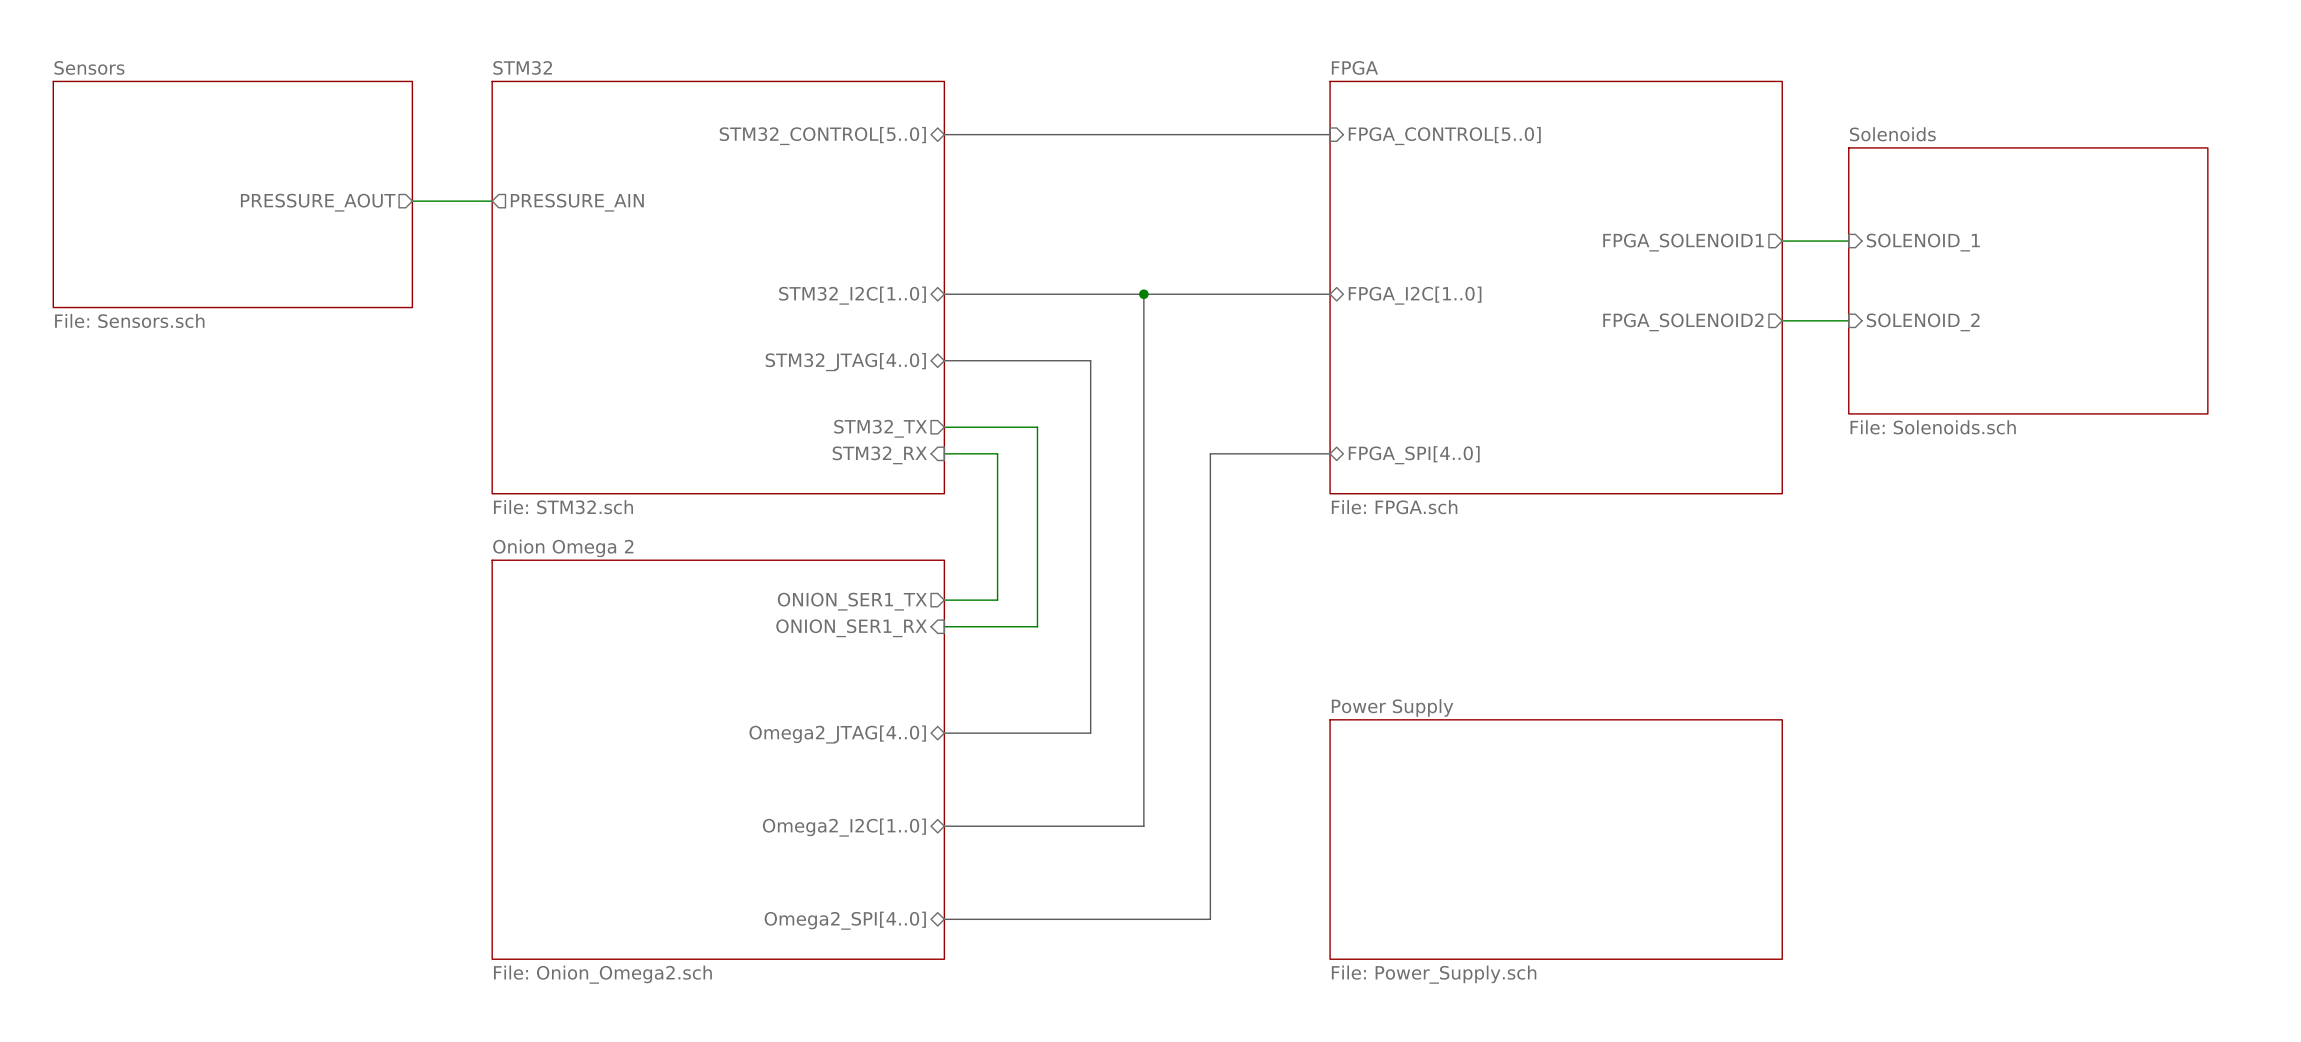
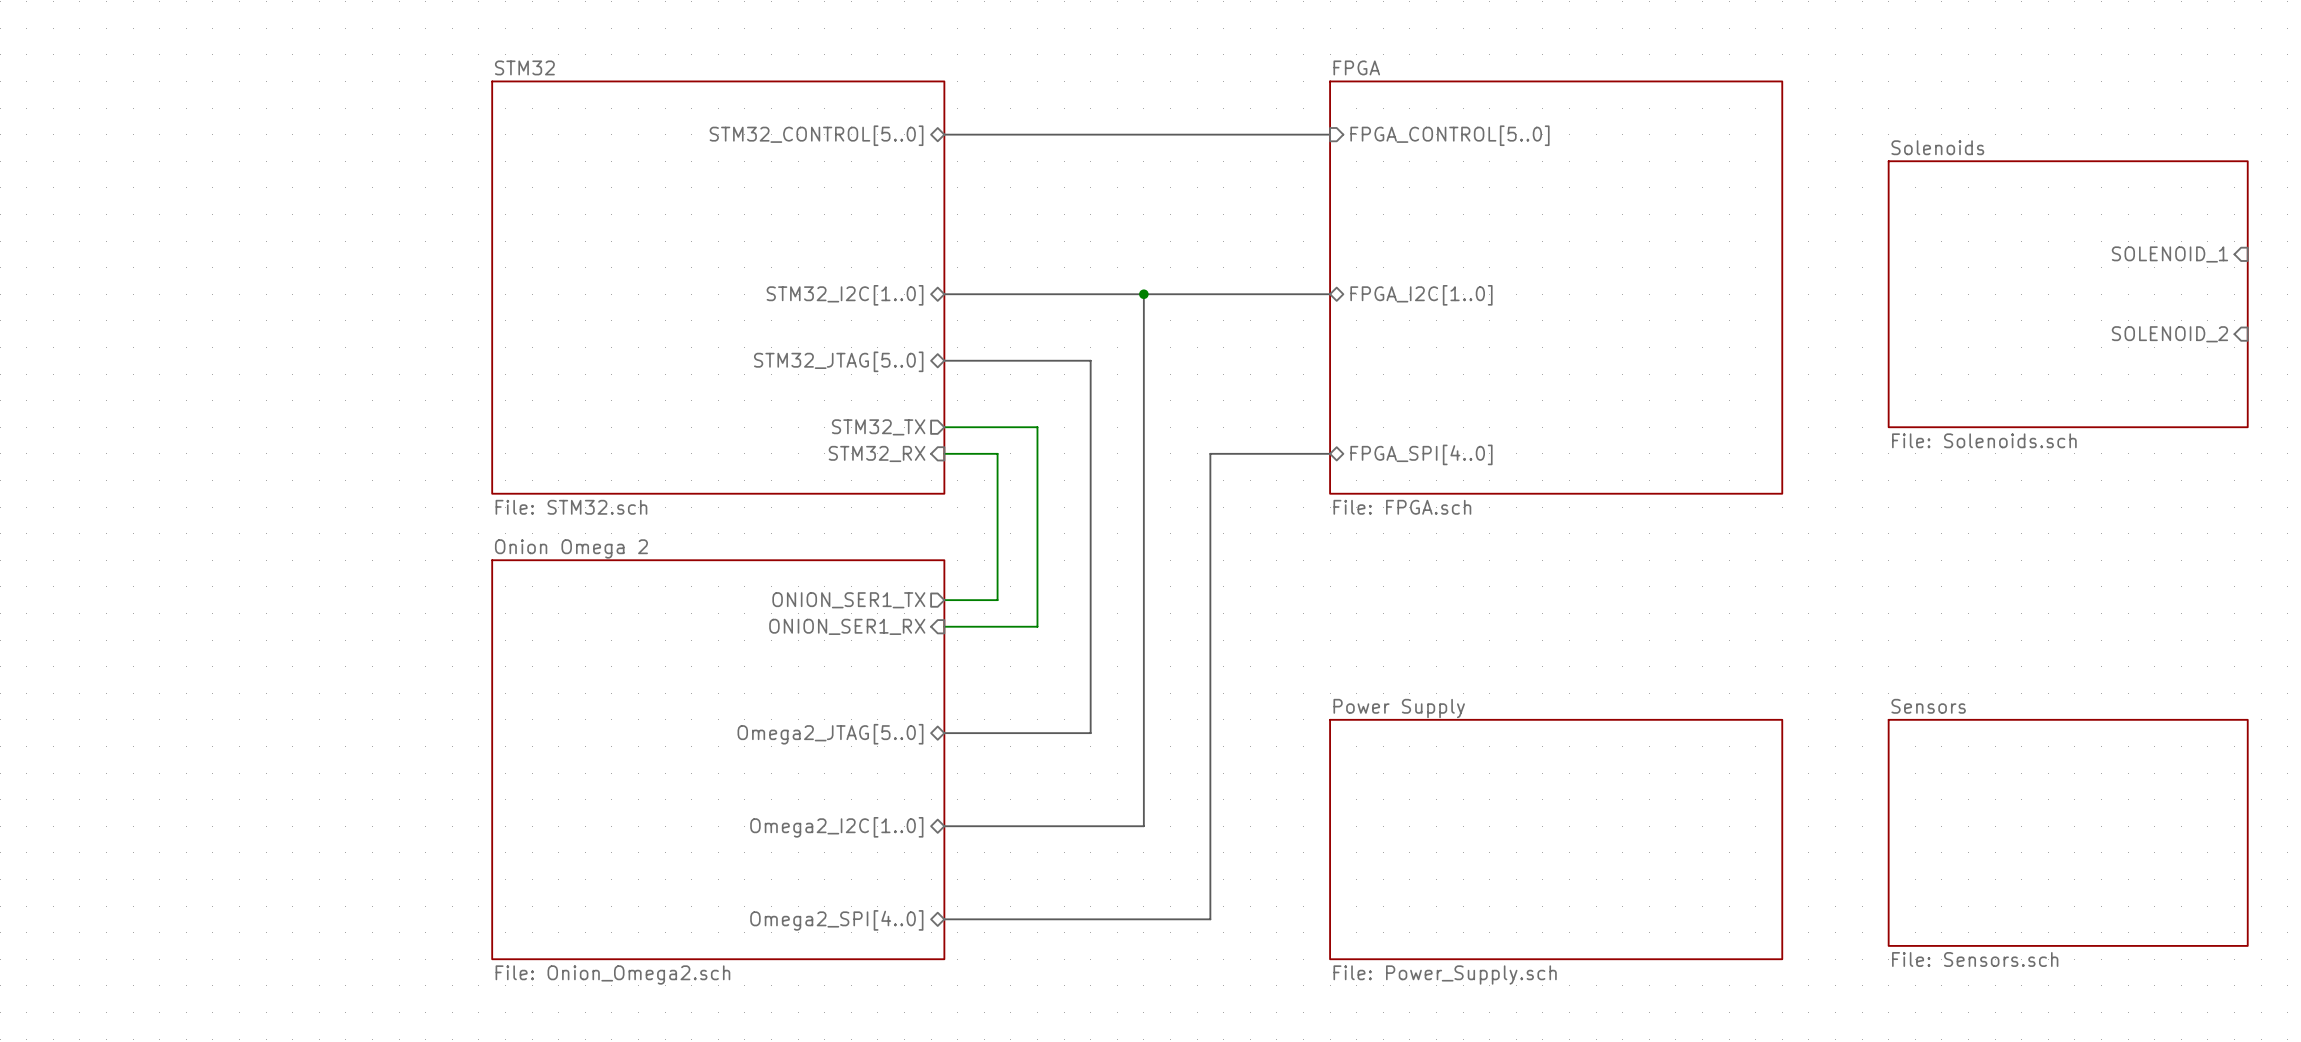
sheet Sensors: File: Sensors.sch (232, 194) -> none
wire: (412, 201) (492, 201) -> none
sheet pin: PRESSURE_AOUT (318, 202) -> none
sheet pin: PRESSURE_AIN (577, 202) -> none
wire: (1782, 241) (1848, 241) -> none
sheet pin: FPGA_SOLENOID1 (1683, 242) -> none
sheet pin: SOLENOID_1 (1923, 242) -> none
sheet pin: none -> SOLENOID_1 (2169, 254)
sheet Solenoids position: (2028, 280) -> (2068, 294)
wire: (1782, 320) (1848, 320) -> none
sheet pin: FPGA_SOLENOID2 (1683, 322) -> none
sheet pin: SOLENOID_2 (1923, 322) -> none
sheet pin: none -> SOLENOID_2 (2169, 334)
sheet pin: STM32_JTAG[4..0] (845, 362) -> STM32_JTAG[5..0] (838, 361)
sheet pin: Omega2_JTAG[4..0] (837, 734) -> Omega2_JTAG[5..0] (830, 734)
sheet Sensors: none -> File: Sensors.sch (2068, 832)

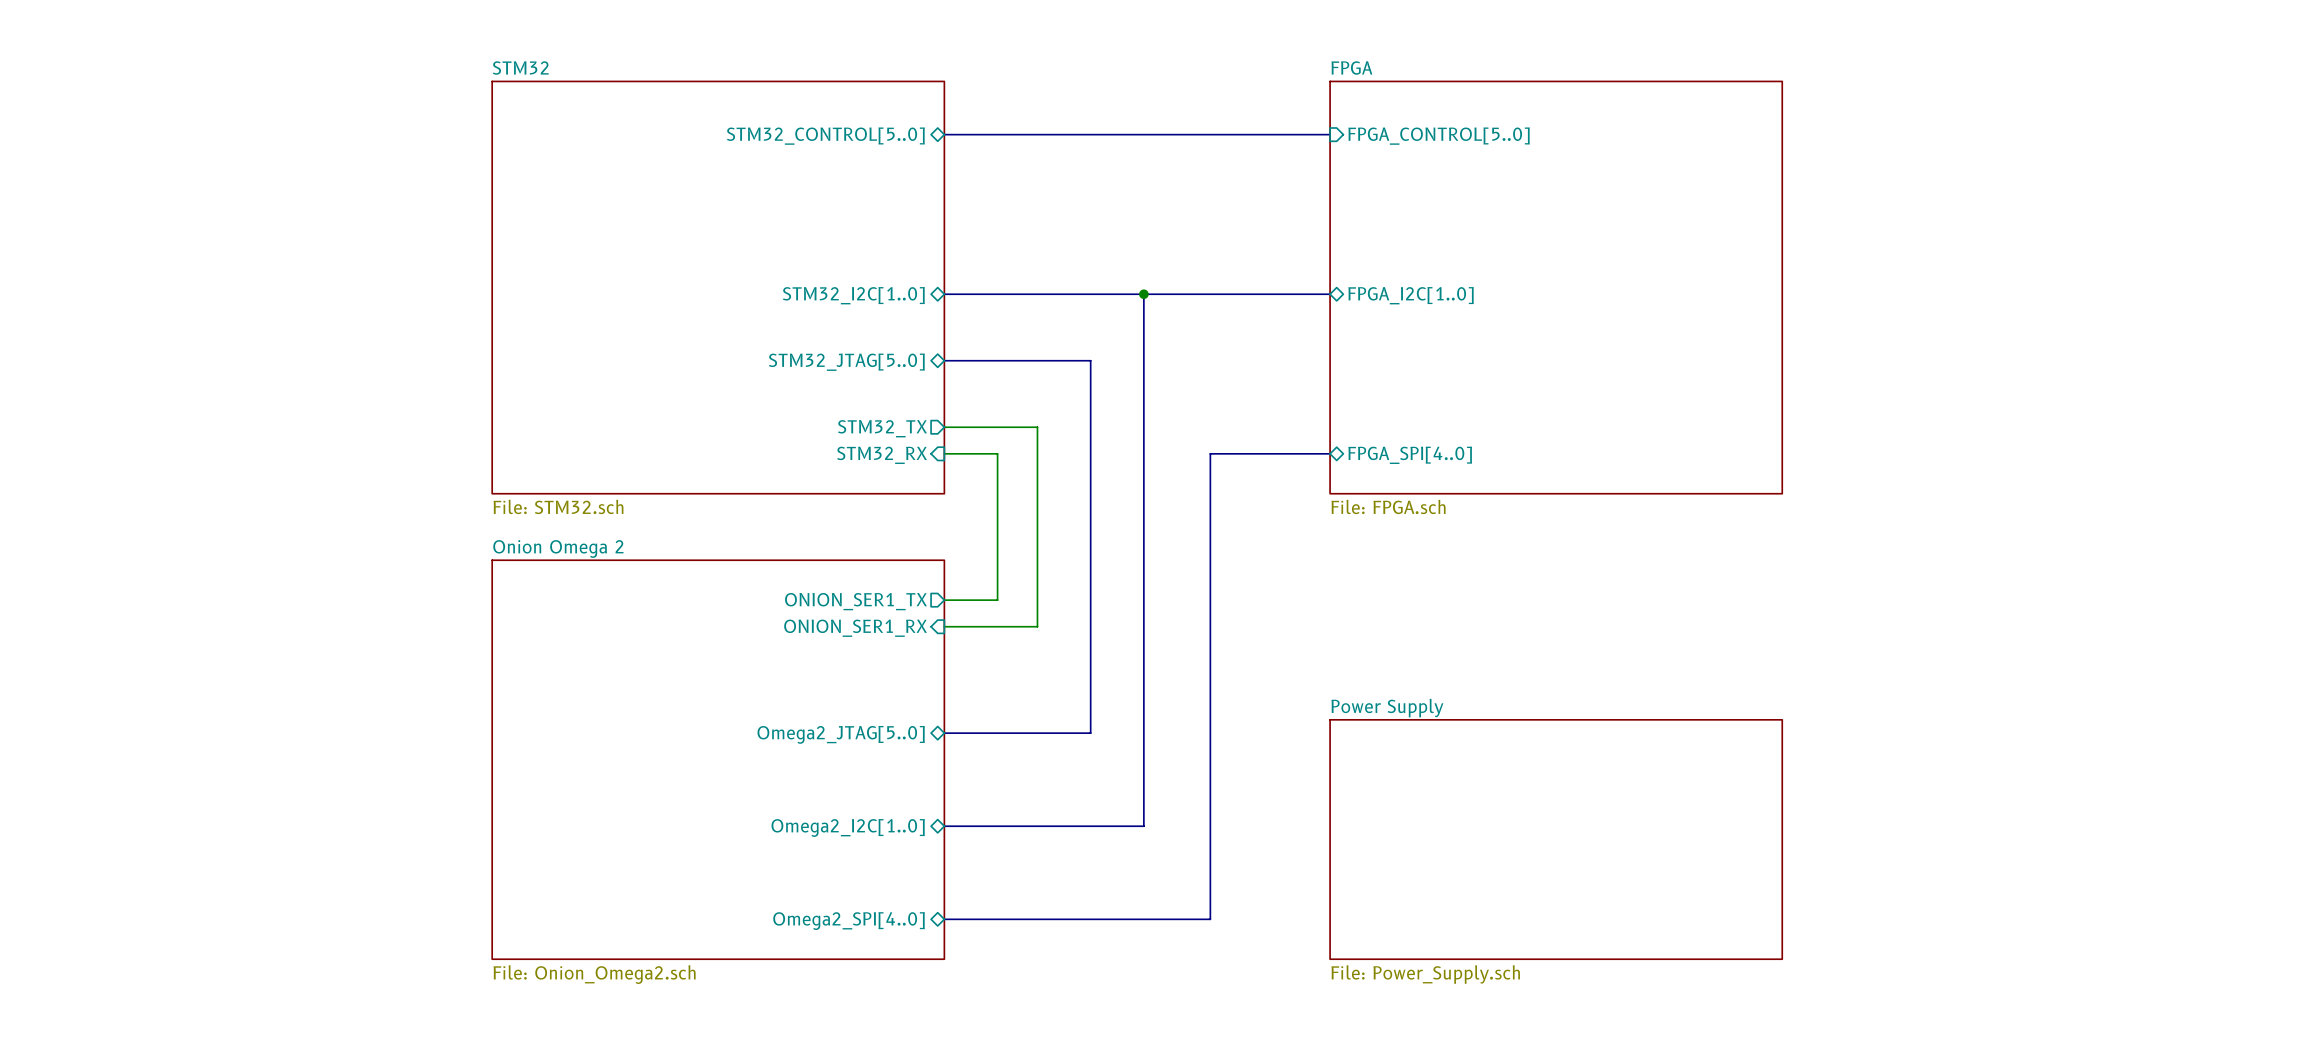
sheet pin: SOLENOID_1 (2169, 254) -> none
sheet Solenoids: File: Solenoids.sch (2068, 294) -> none
sheet pin: SOLENOID_2 (2169, 334) -> none
sheet Sensors: File: Sensors.sch (2068, 832) -> none

